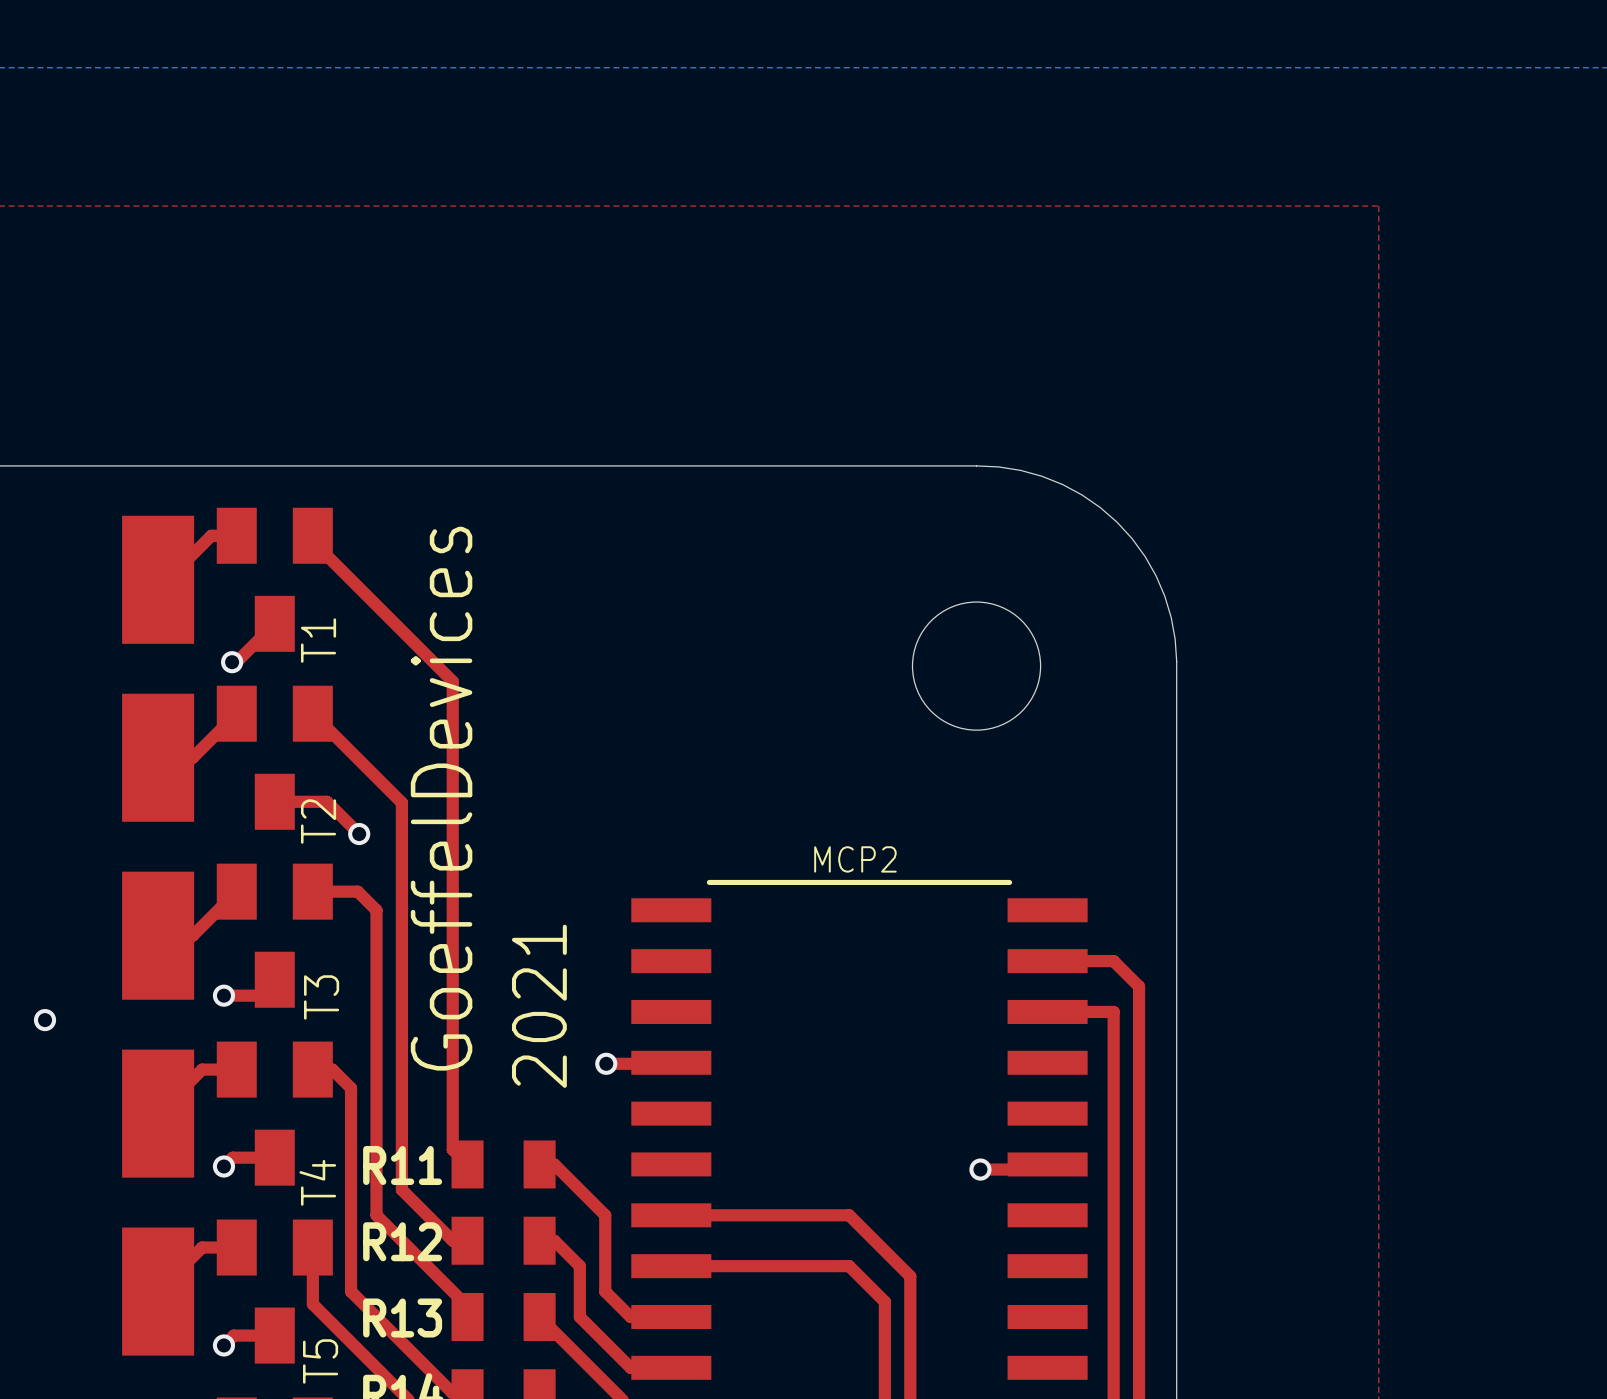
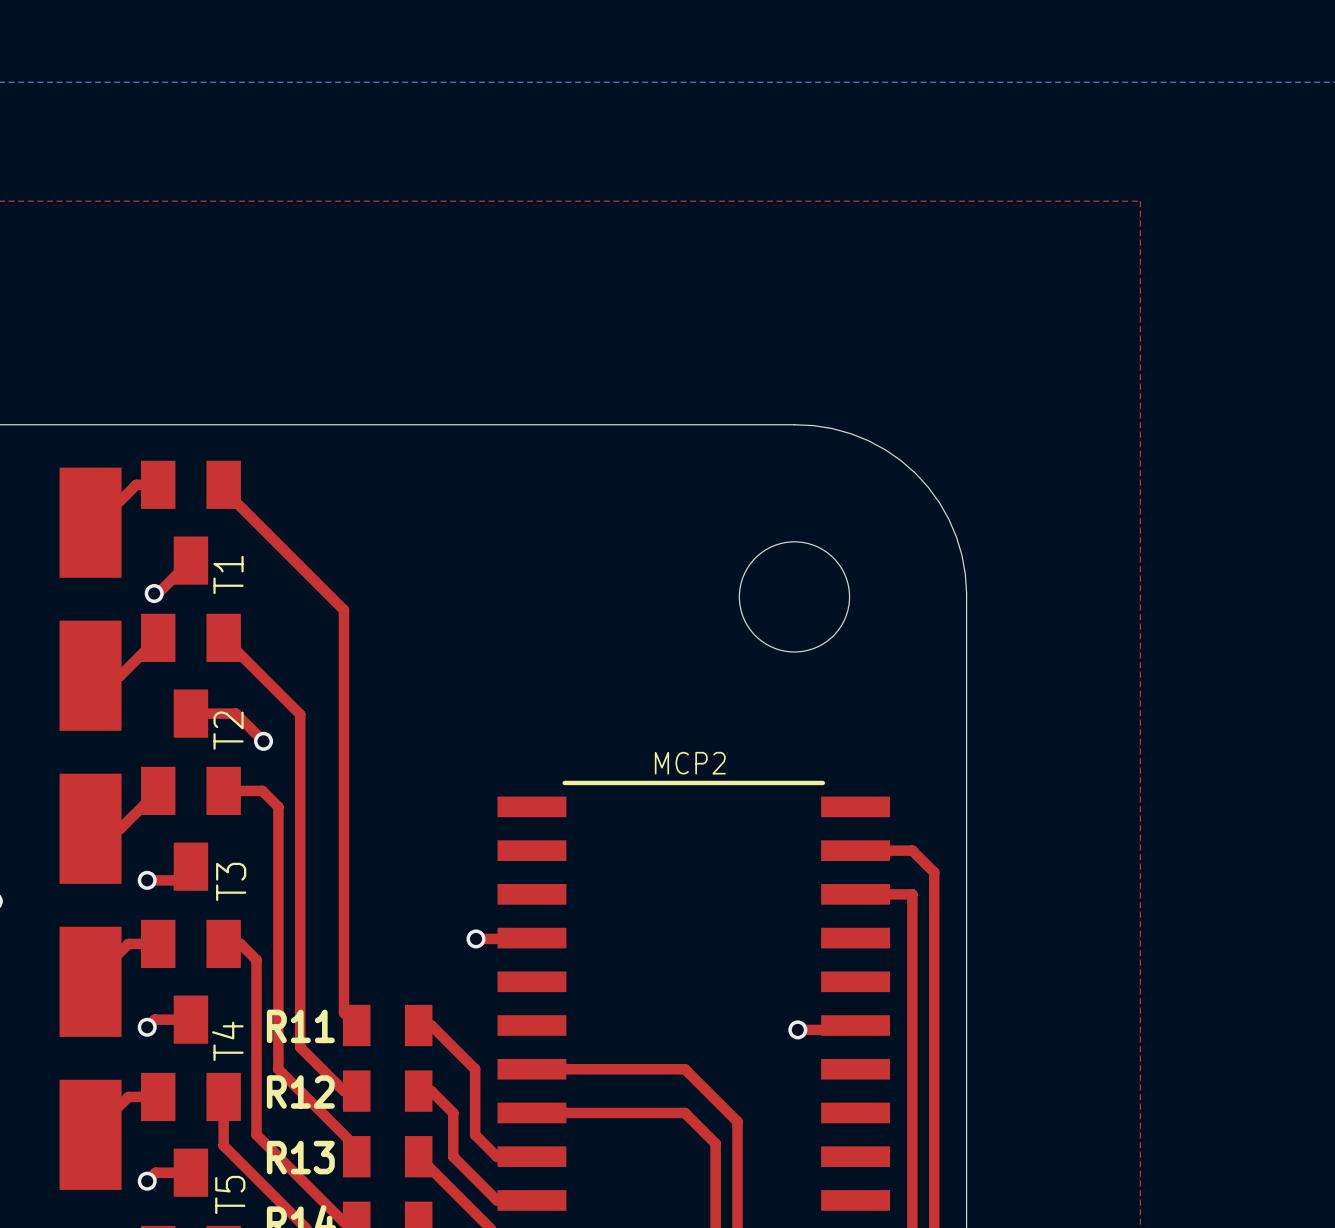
text: GoeffelDevices (441, 798) -> none
text: 2021 (539, 1006) -> none

